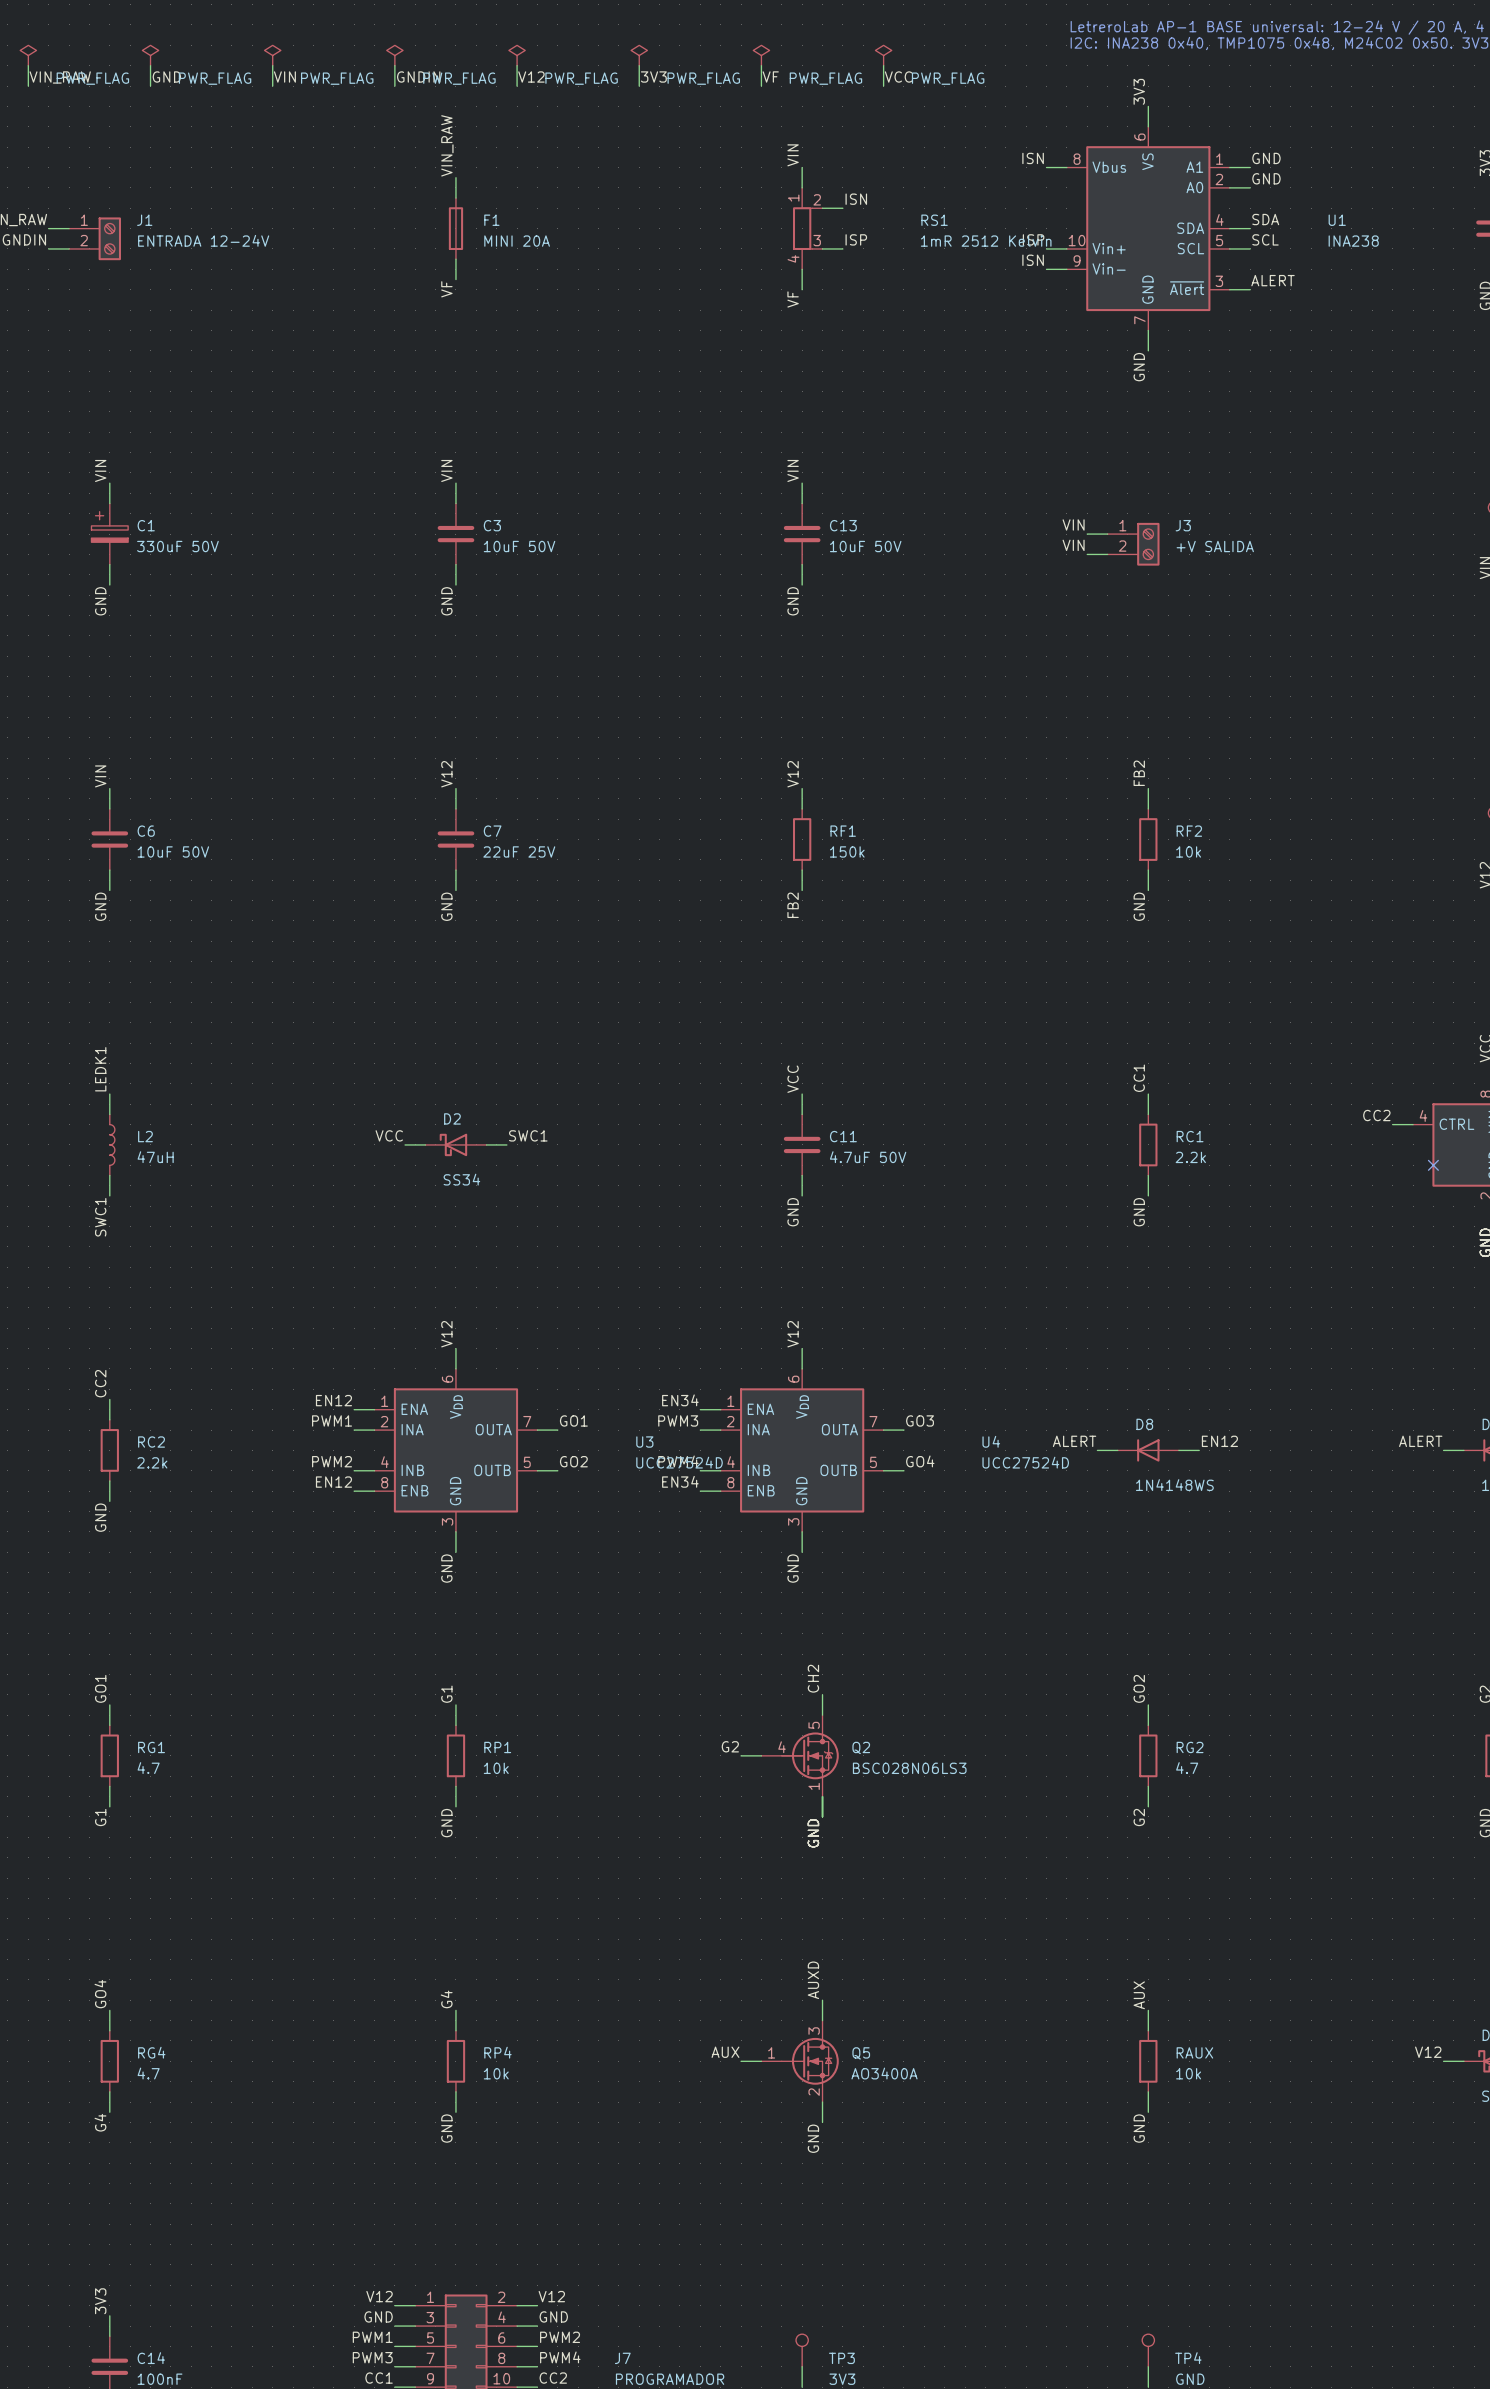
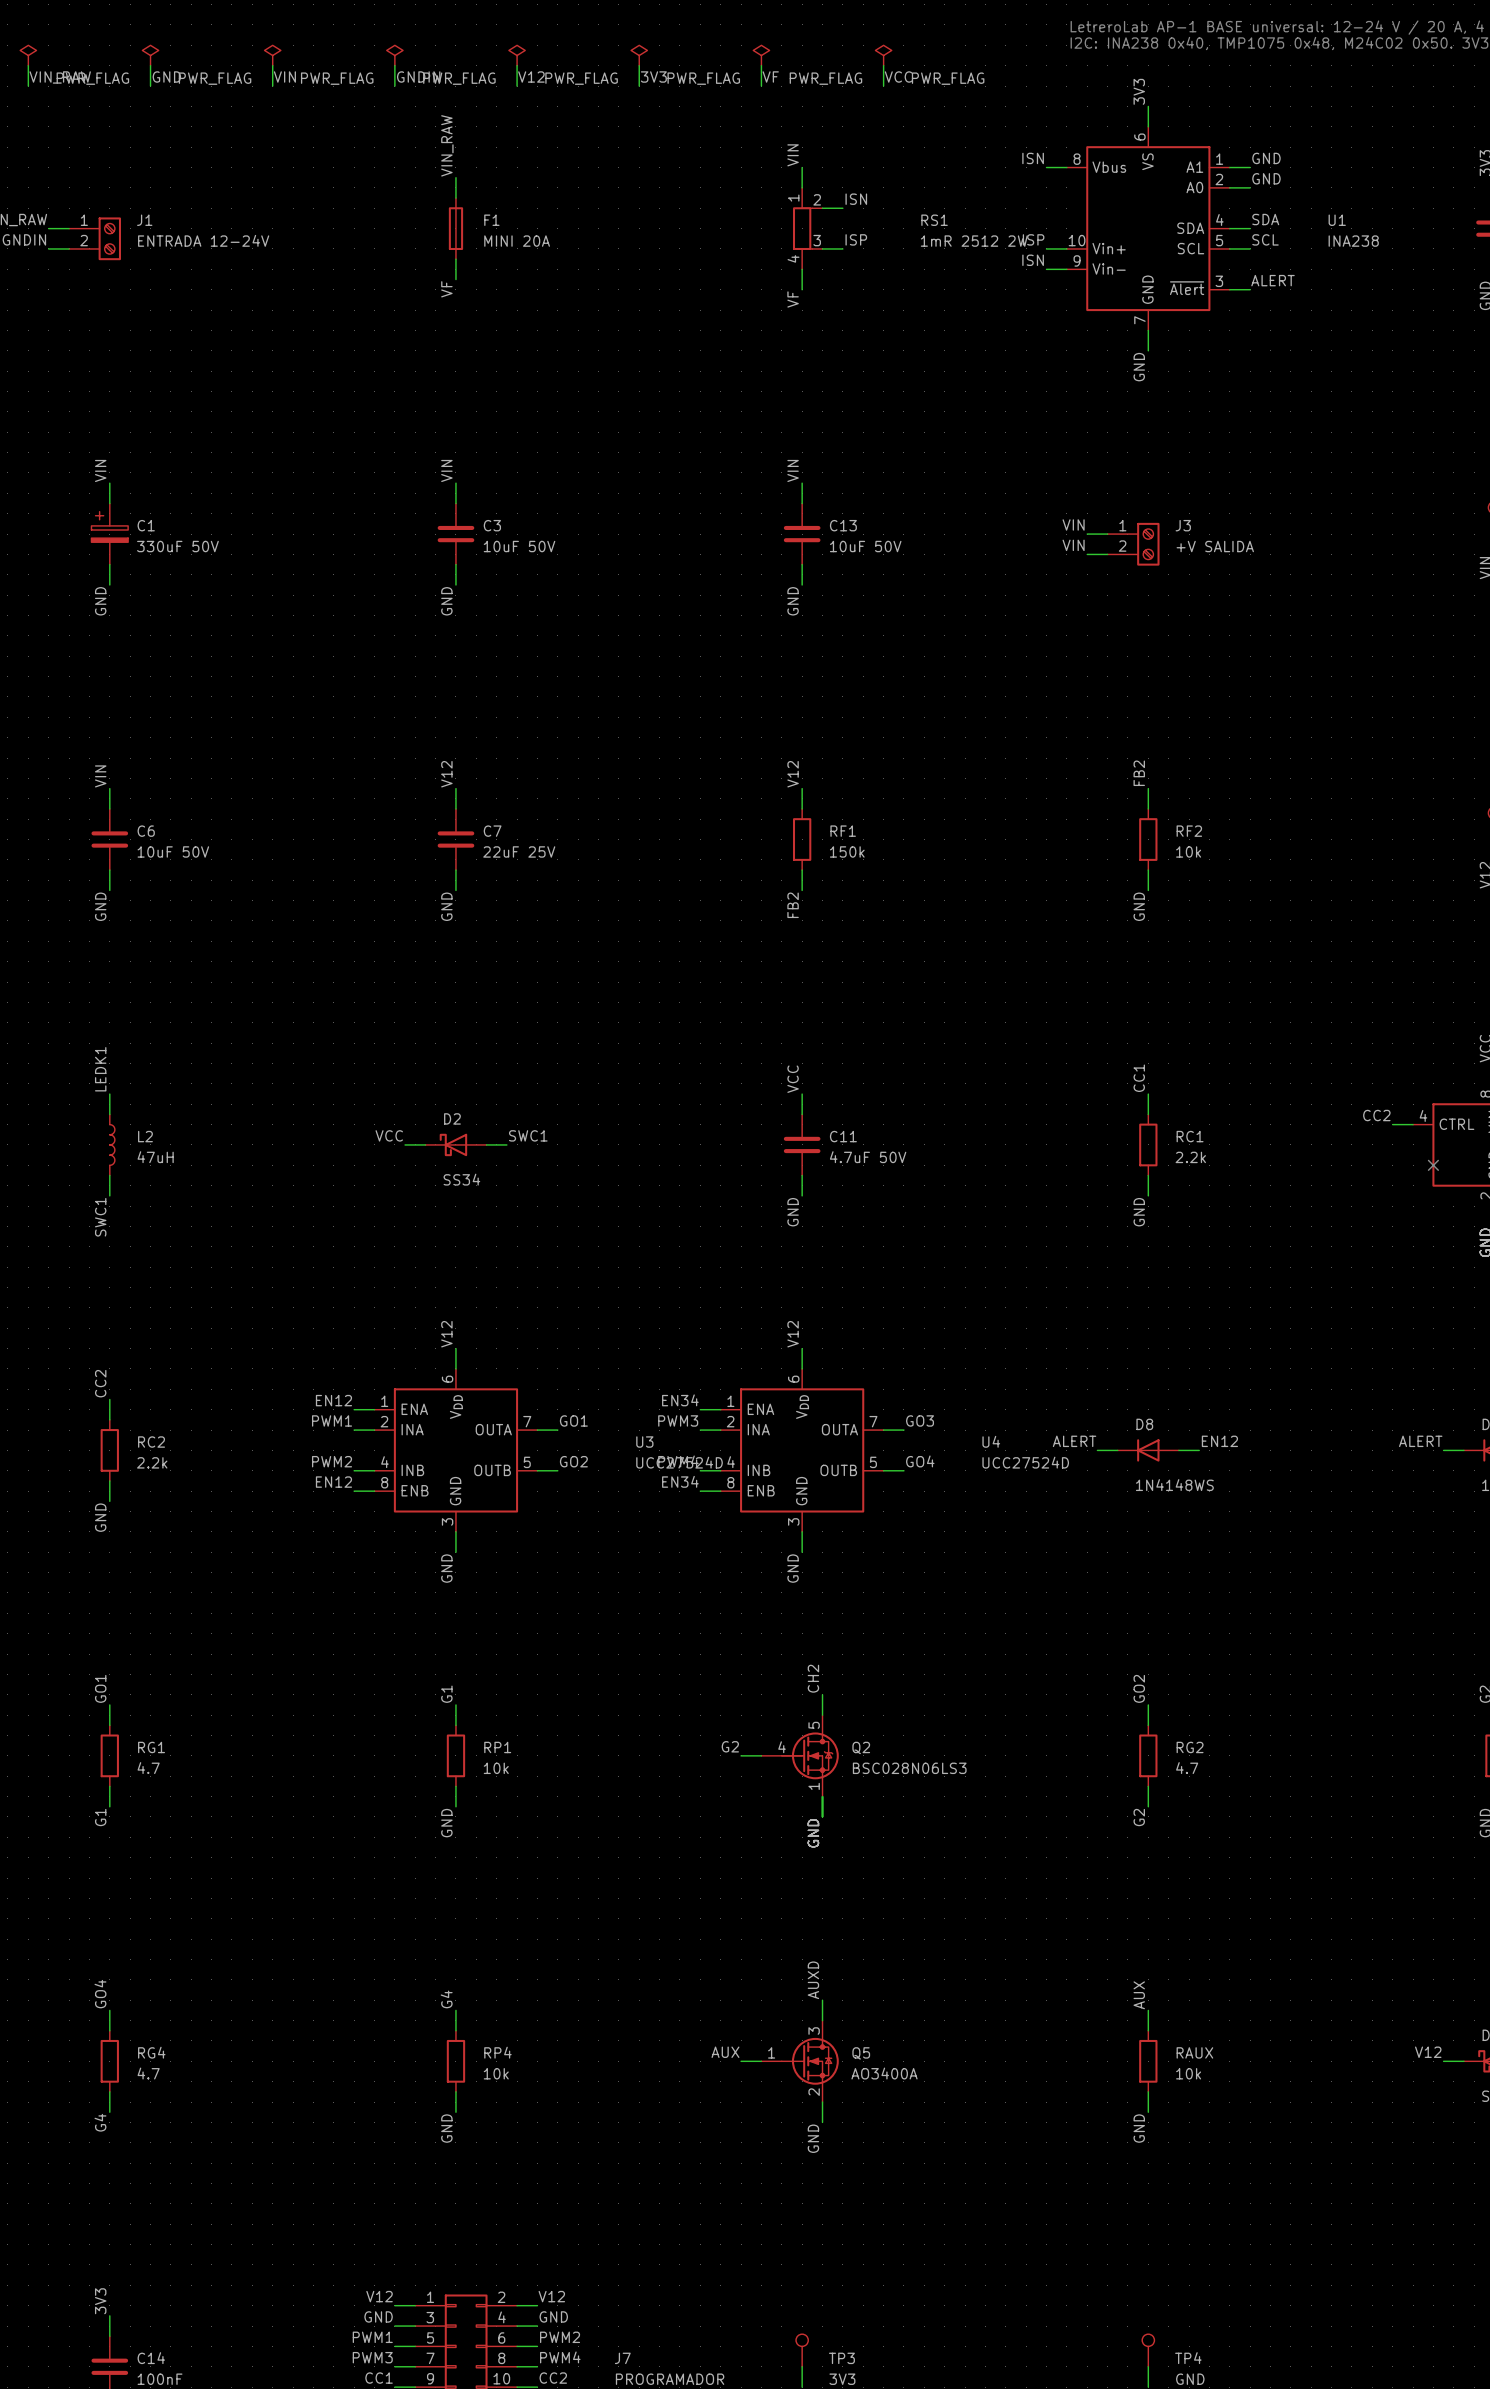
RS1 value: 1mR 2512 Kelvin (986, 241) -> 1mR 2512 2W (974, 241)

